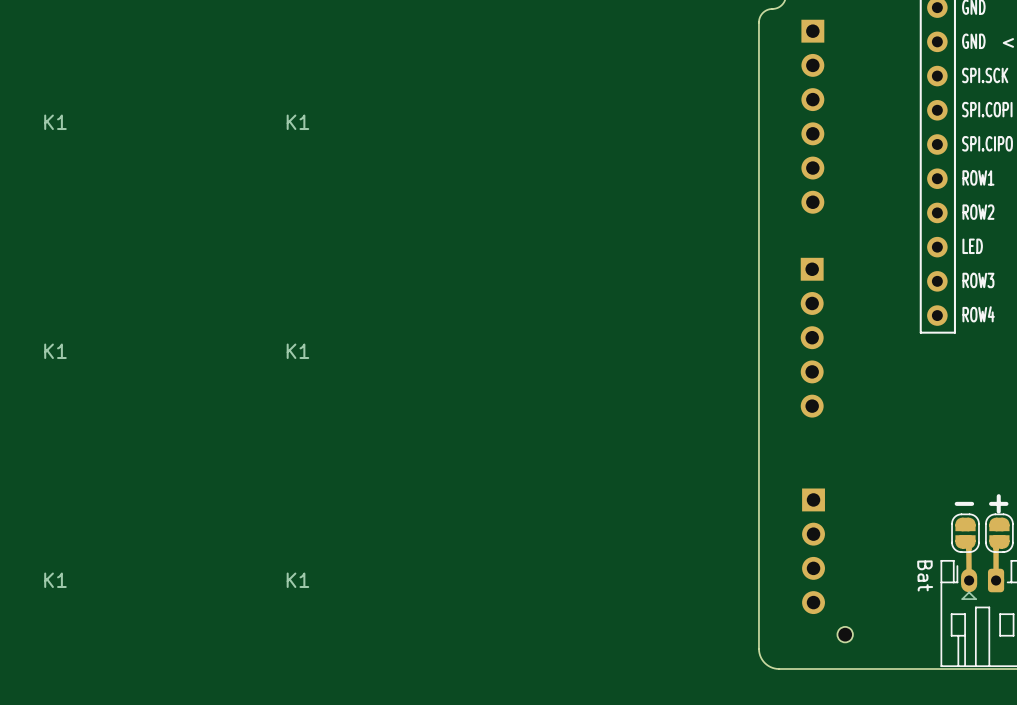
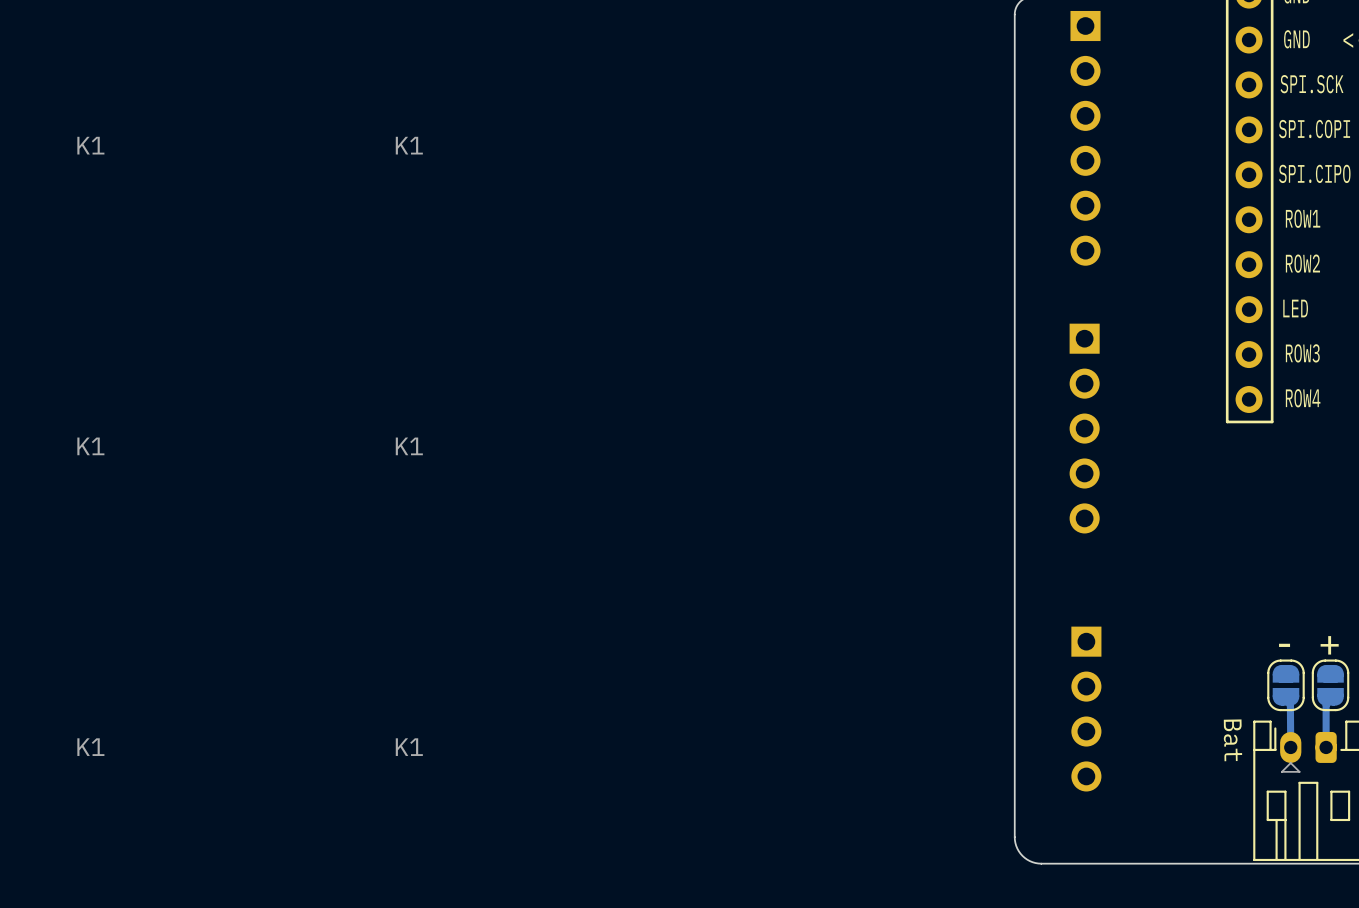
part: (845, 634) -> none

